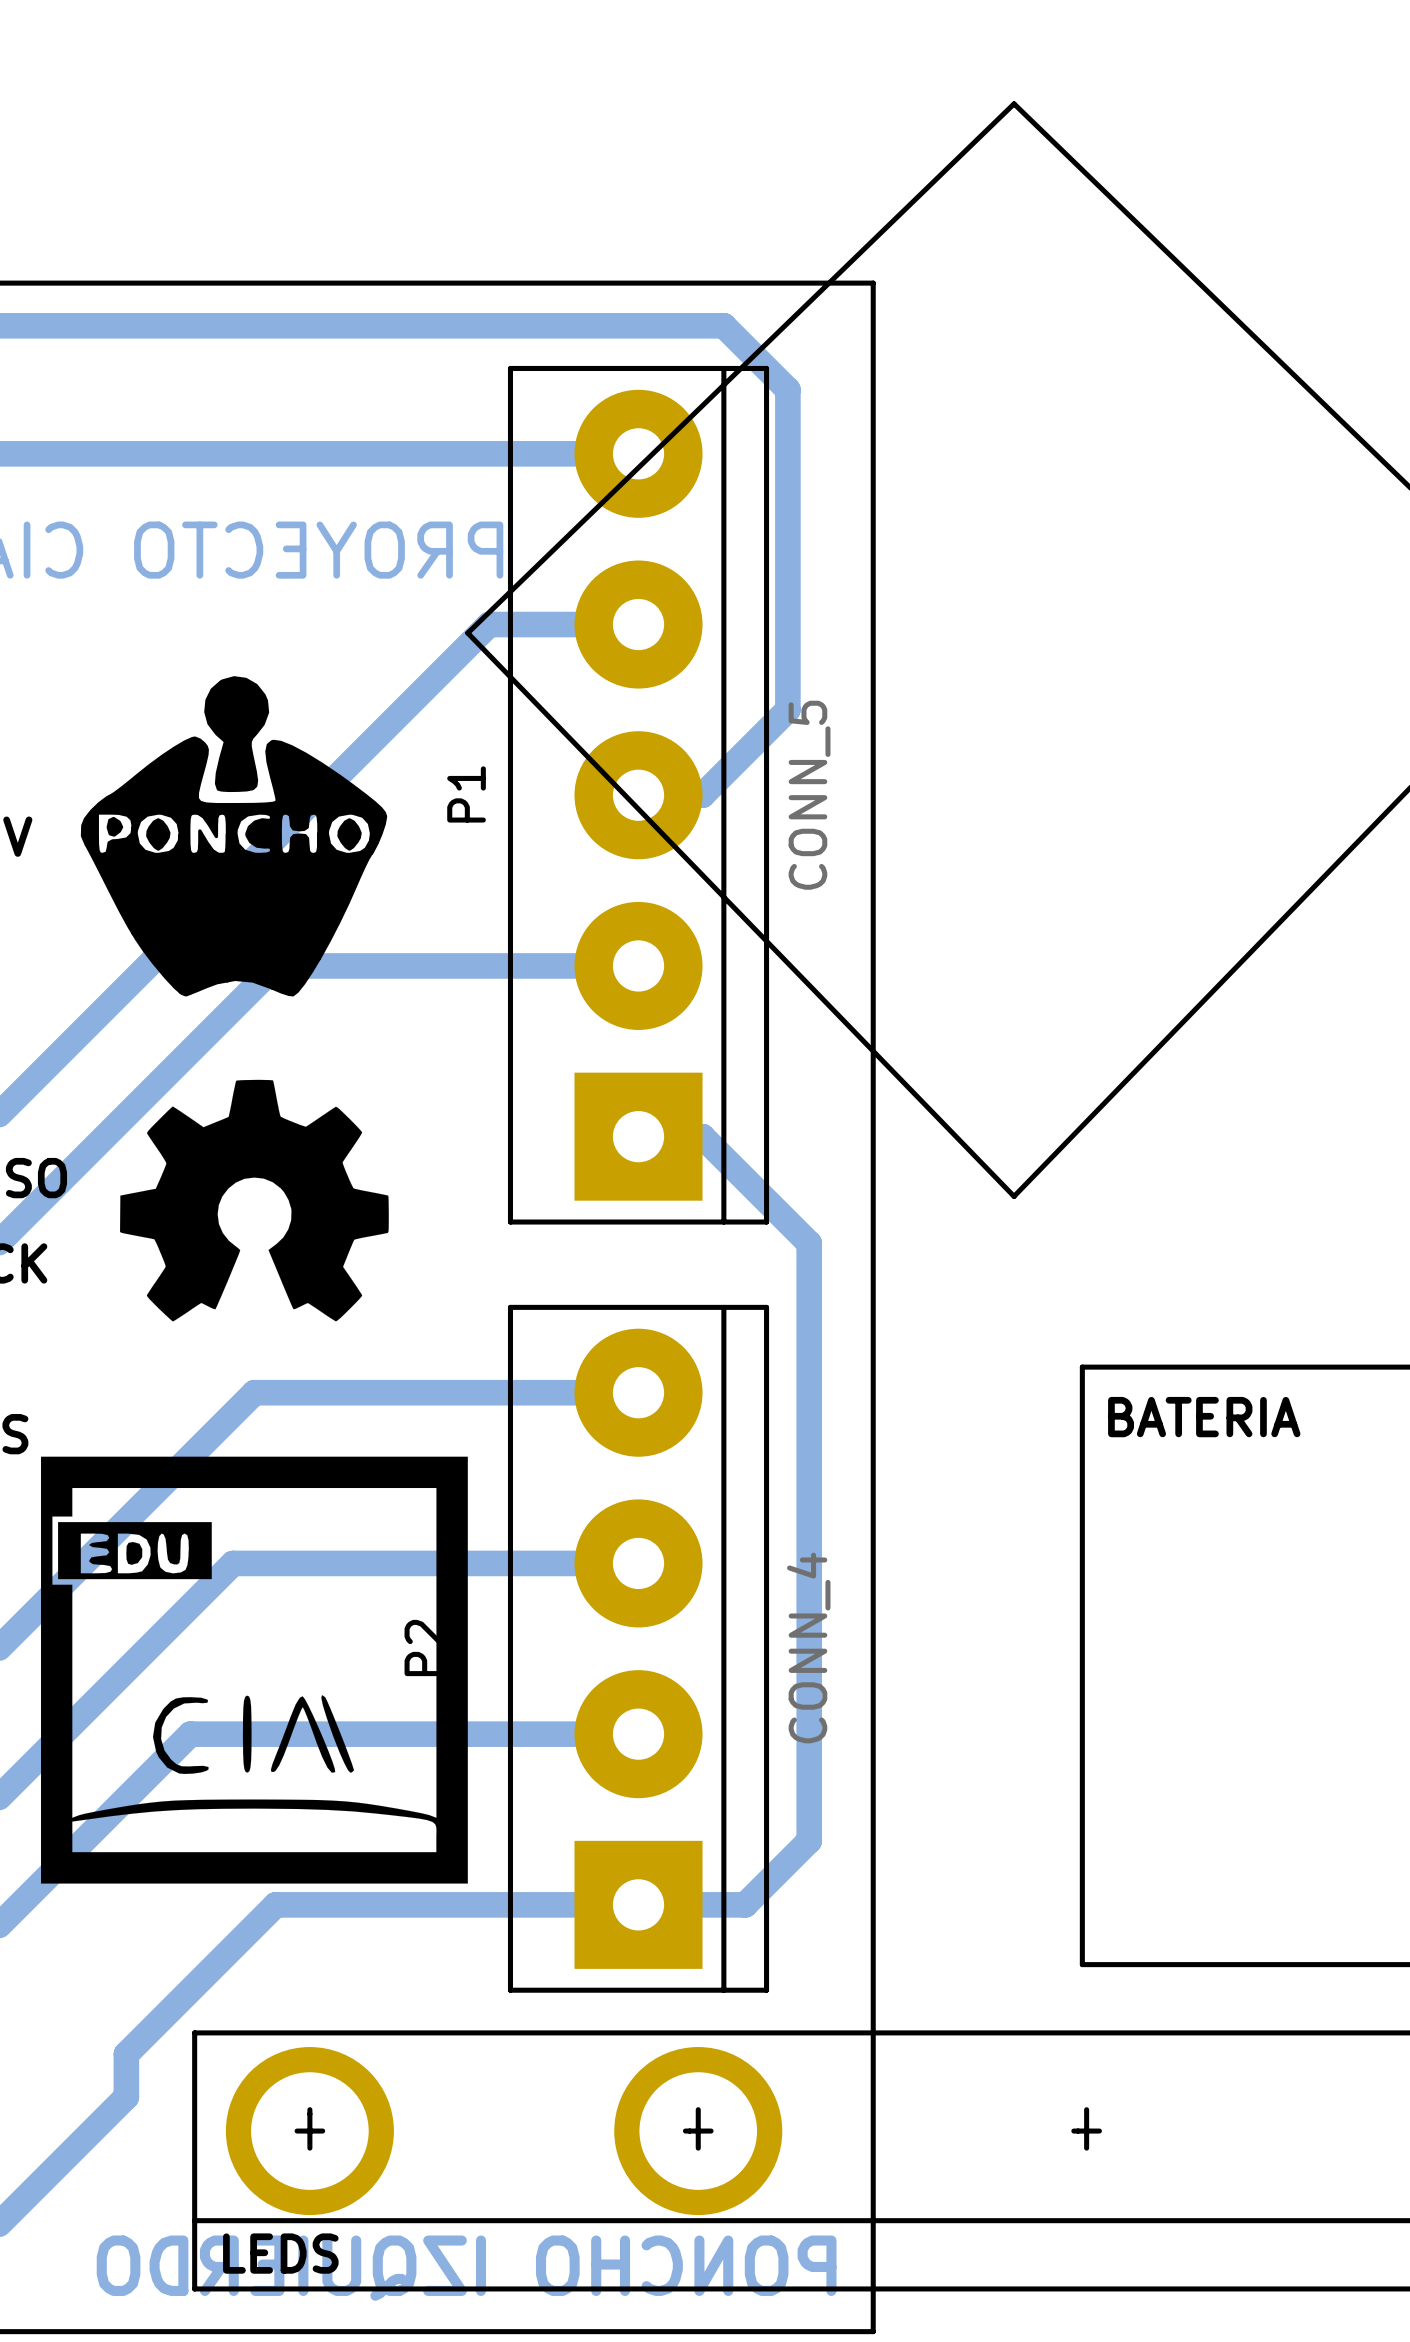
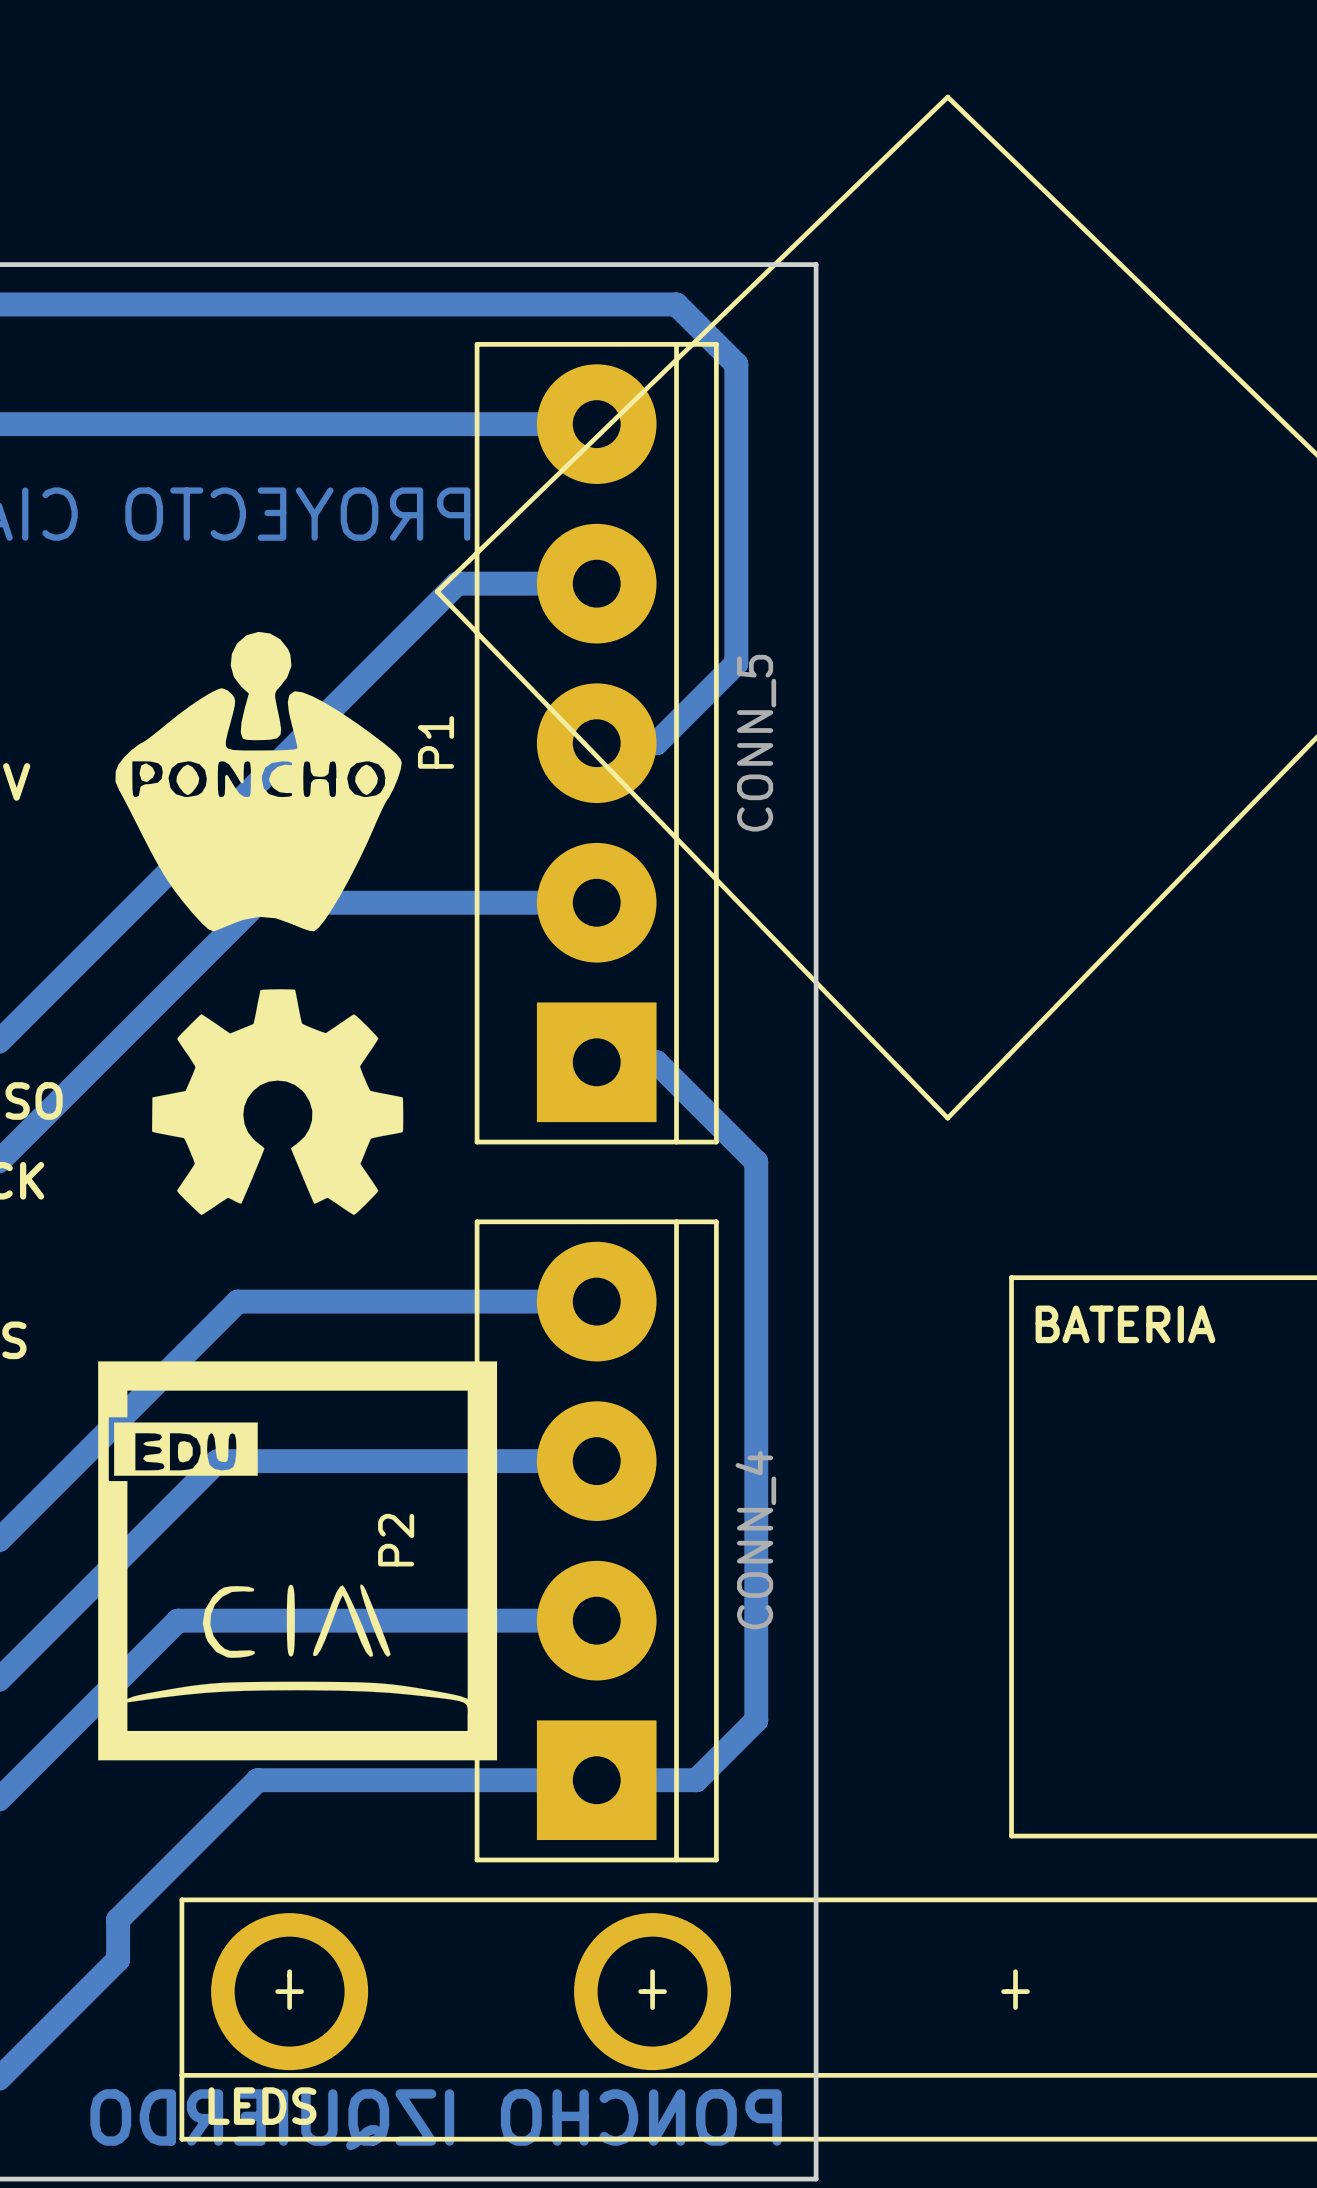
drawing position: (234, 836) -> (258, 781)
drawing position: (254, 1200) -> (277, 1102)
drawing position: (254, 1670) -> (297, 1560)

